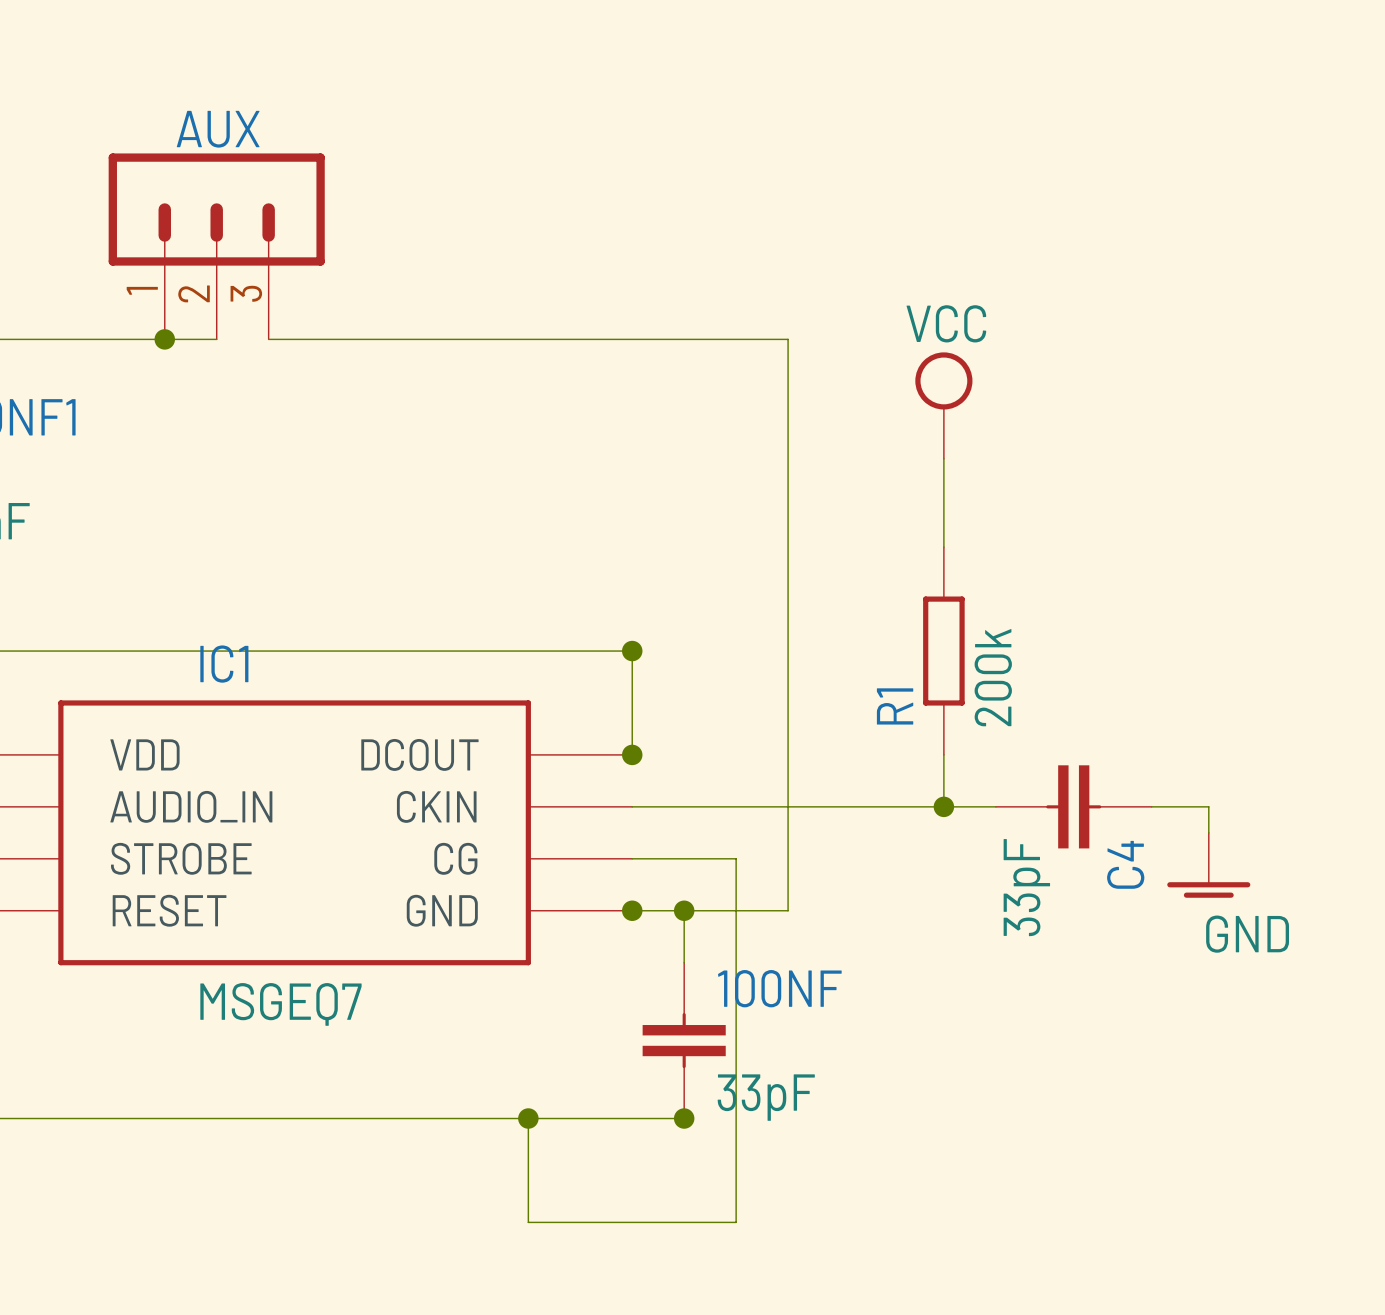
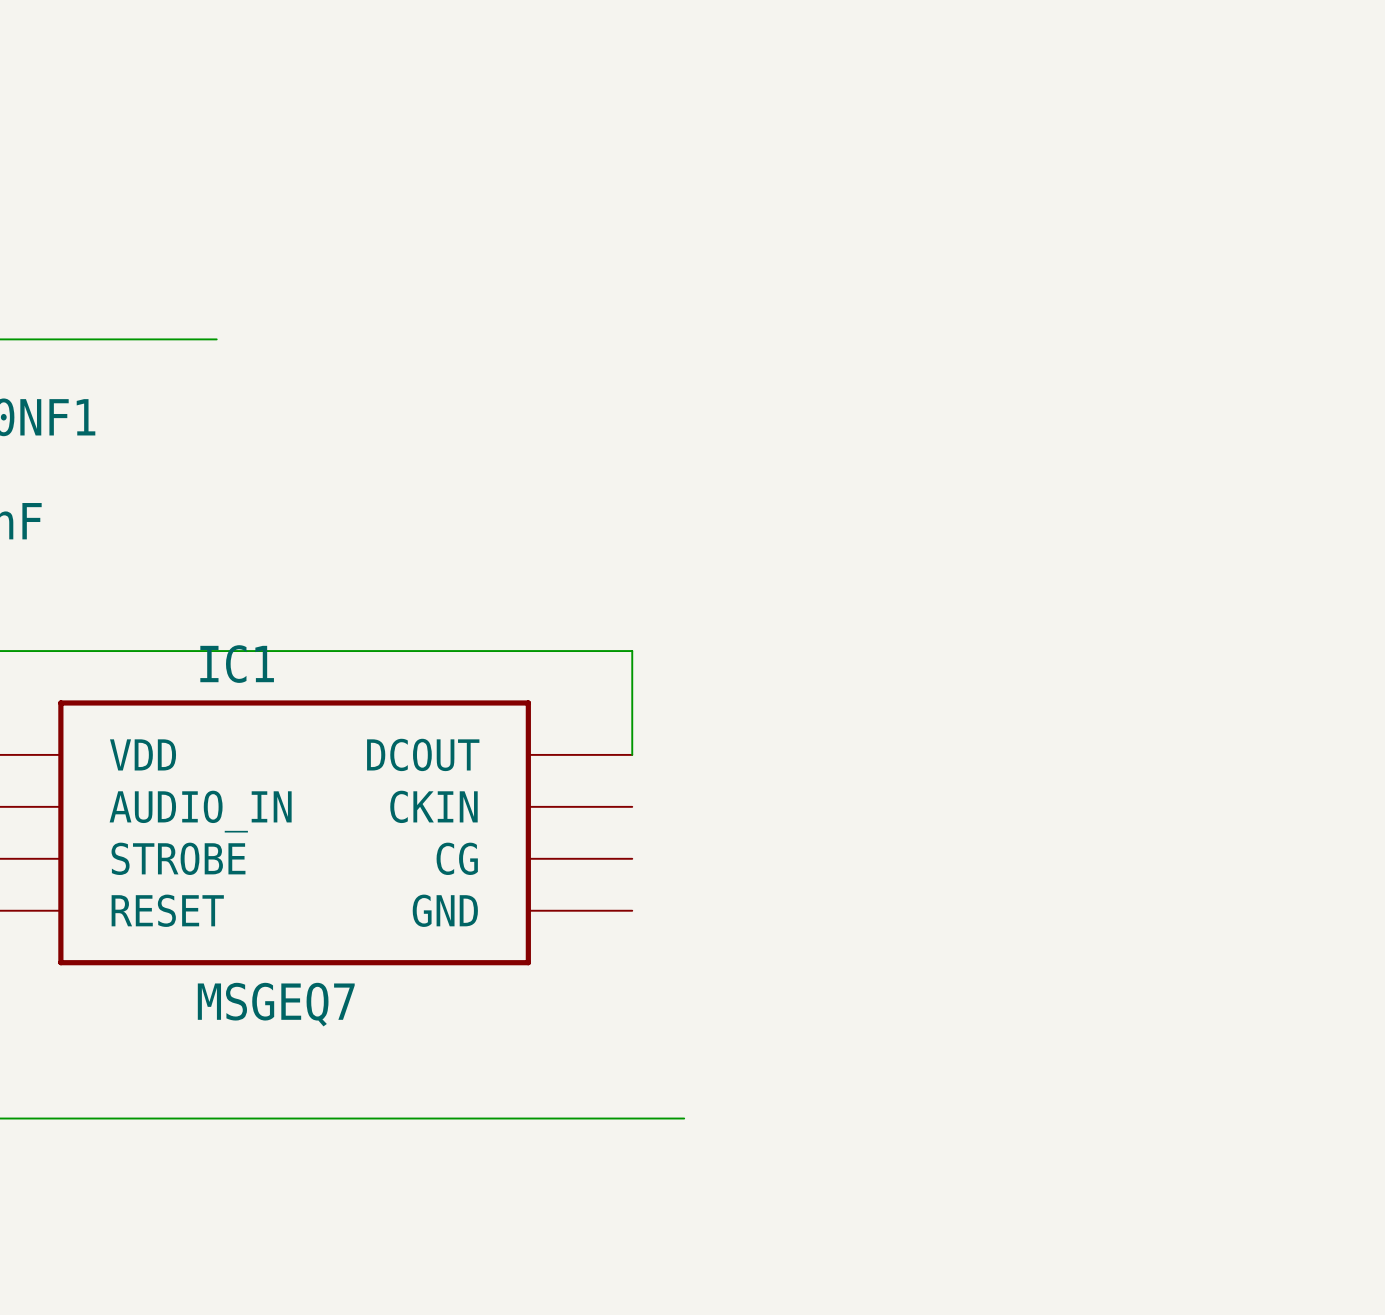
AUX: (216, 246) -> none
junction: (164, 339) -> none
wire: (268, 339) (788, 339) (788, 910) (632, 910) -> none
power symbol: VCC (943, 405) -> none
wire: (943, 458) (943, 547) -> none
junction: (632, 651) -> none
R1: 200k (943, 651) -> none
junction: (632, 754) -> none
wire: (943, 754) (943, 806) -> none
wire: (632, 806) (995, 806) -> none
junction: (943, 806) -> none
C4: 33pF (1073, 806) -> none
wire: (1151, 806) (1208, 806) (1208, 832) -> none
wire: (632, 858) (736, 858) (736, 1222) (528, 1222) (528, 1118) -> none
power symbol: GND (1208, 865) -> none
junction: (632, 910) -> none
wire: (684, 910) (684, 962) -> none
junction: (684, 910) -> none
100NF: 33pF (684, 1040) -> none
junction: (528, 1118) -> none
junction: (684, 1118) -> none

